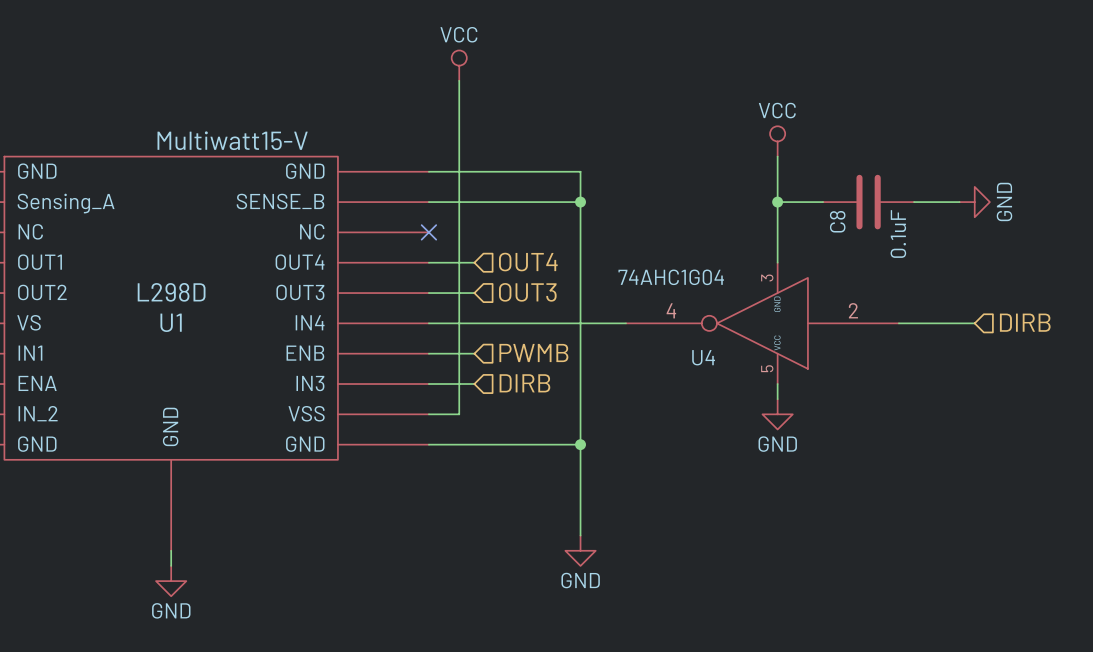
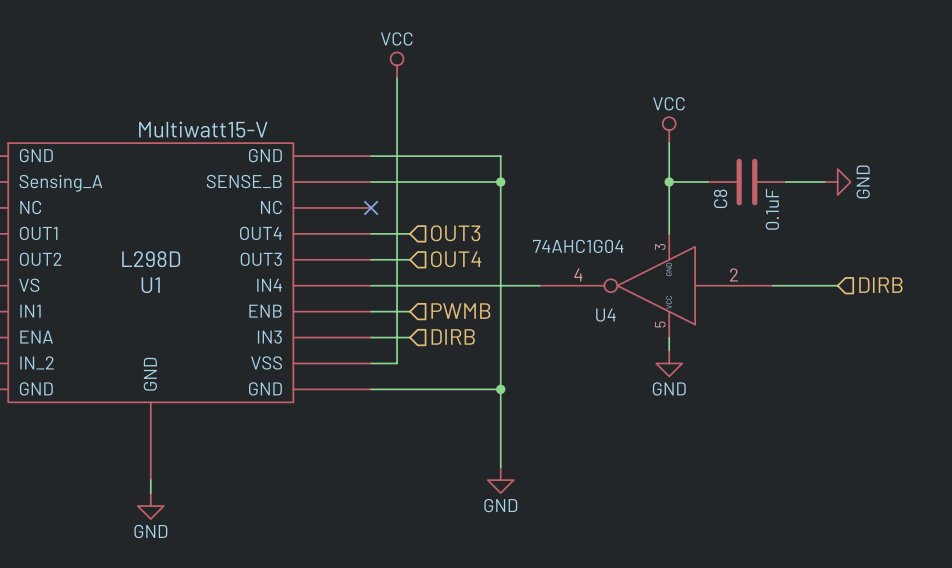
hierarchical label: OUT4 (528, 262) -> OUT3 (455, 233)
hierarchical label: OUT3 (527, 292) -> OUT4 (456, 259)

